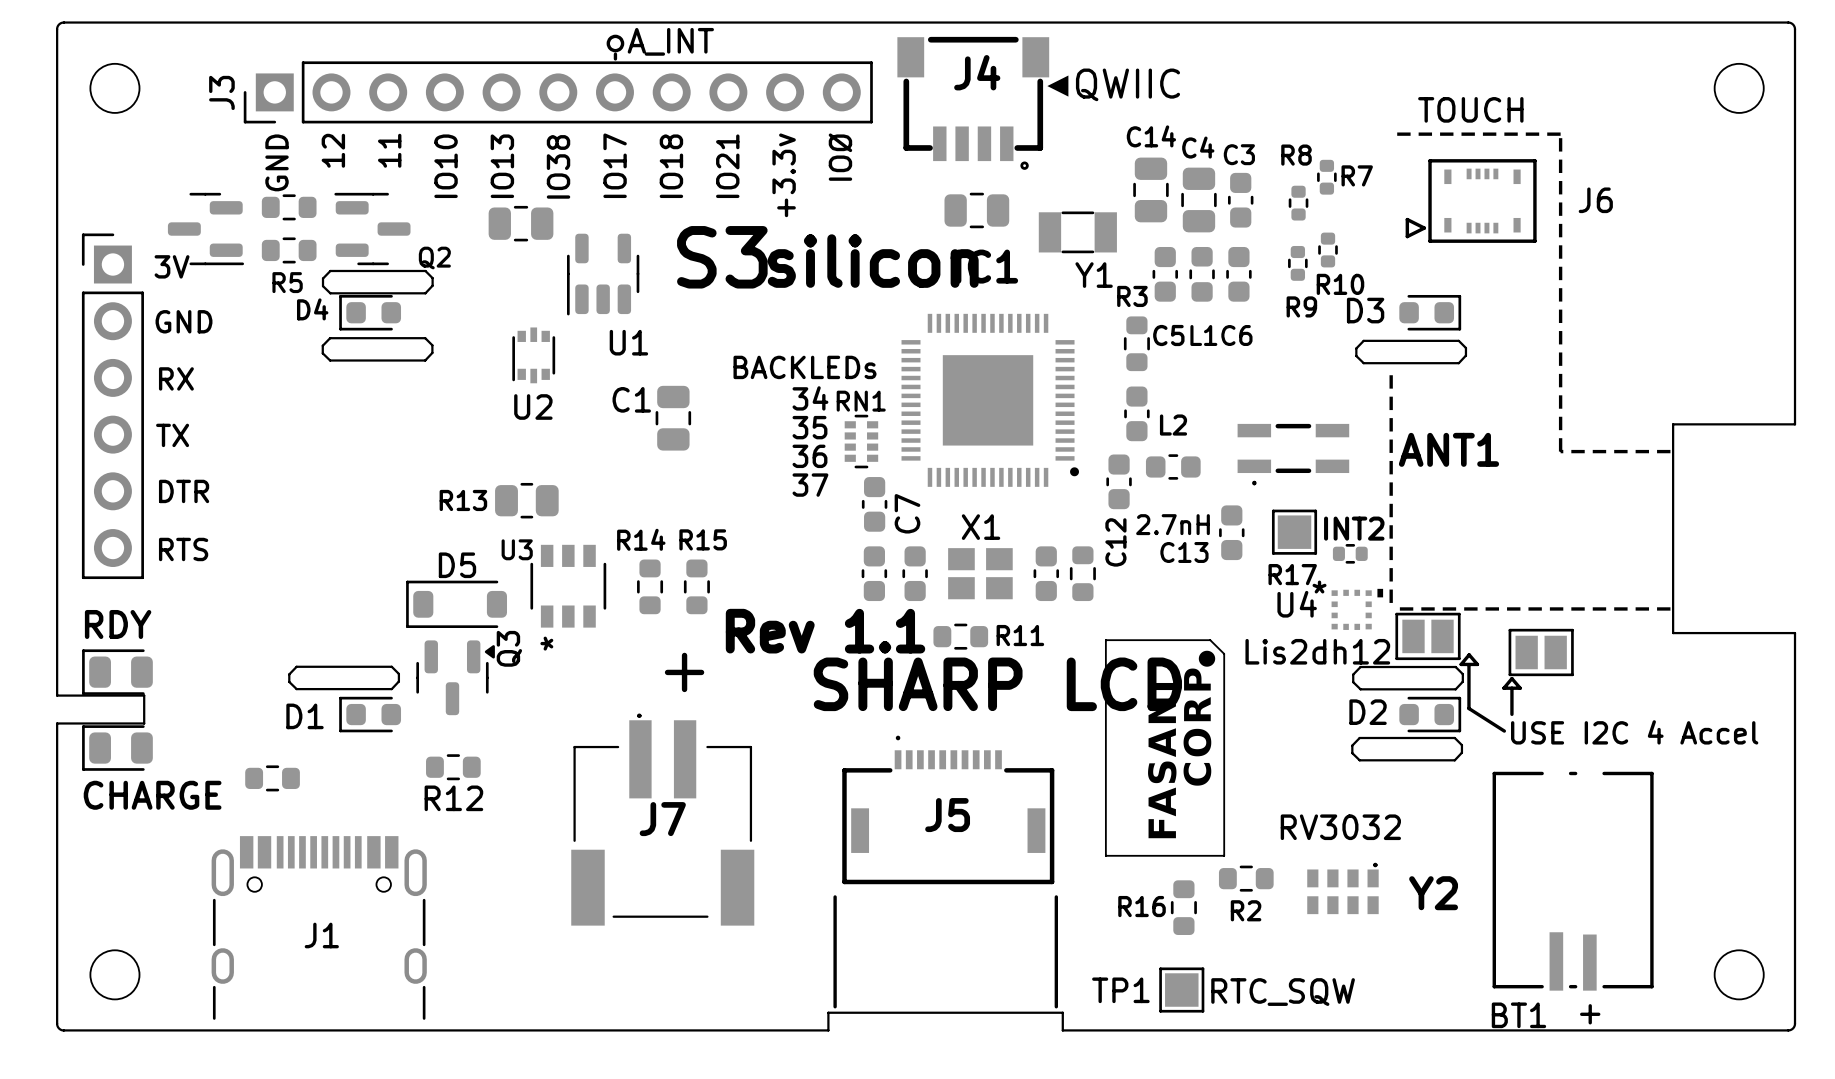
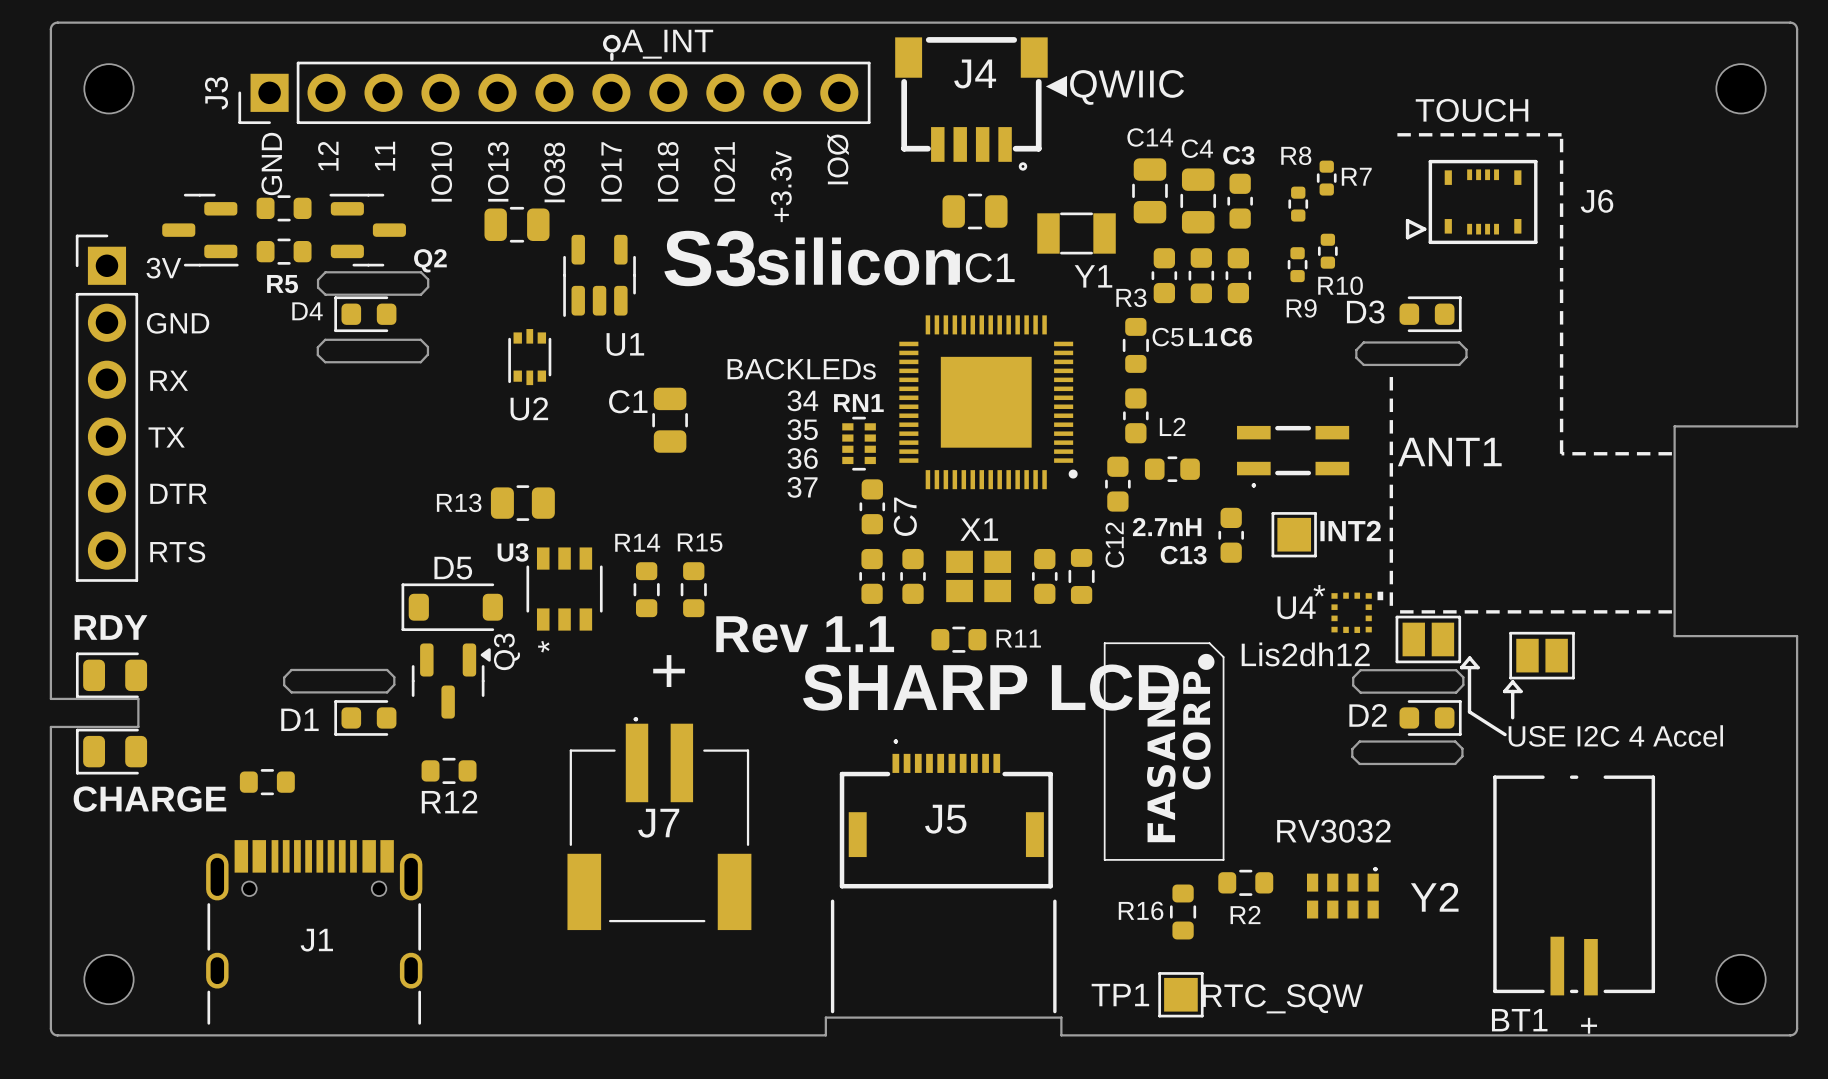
R17: (1350, 553) -> none

